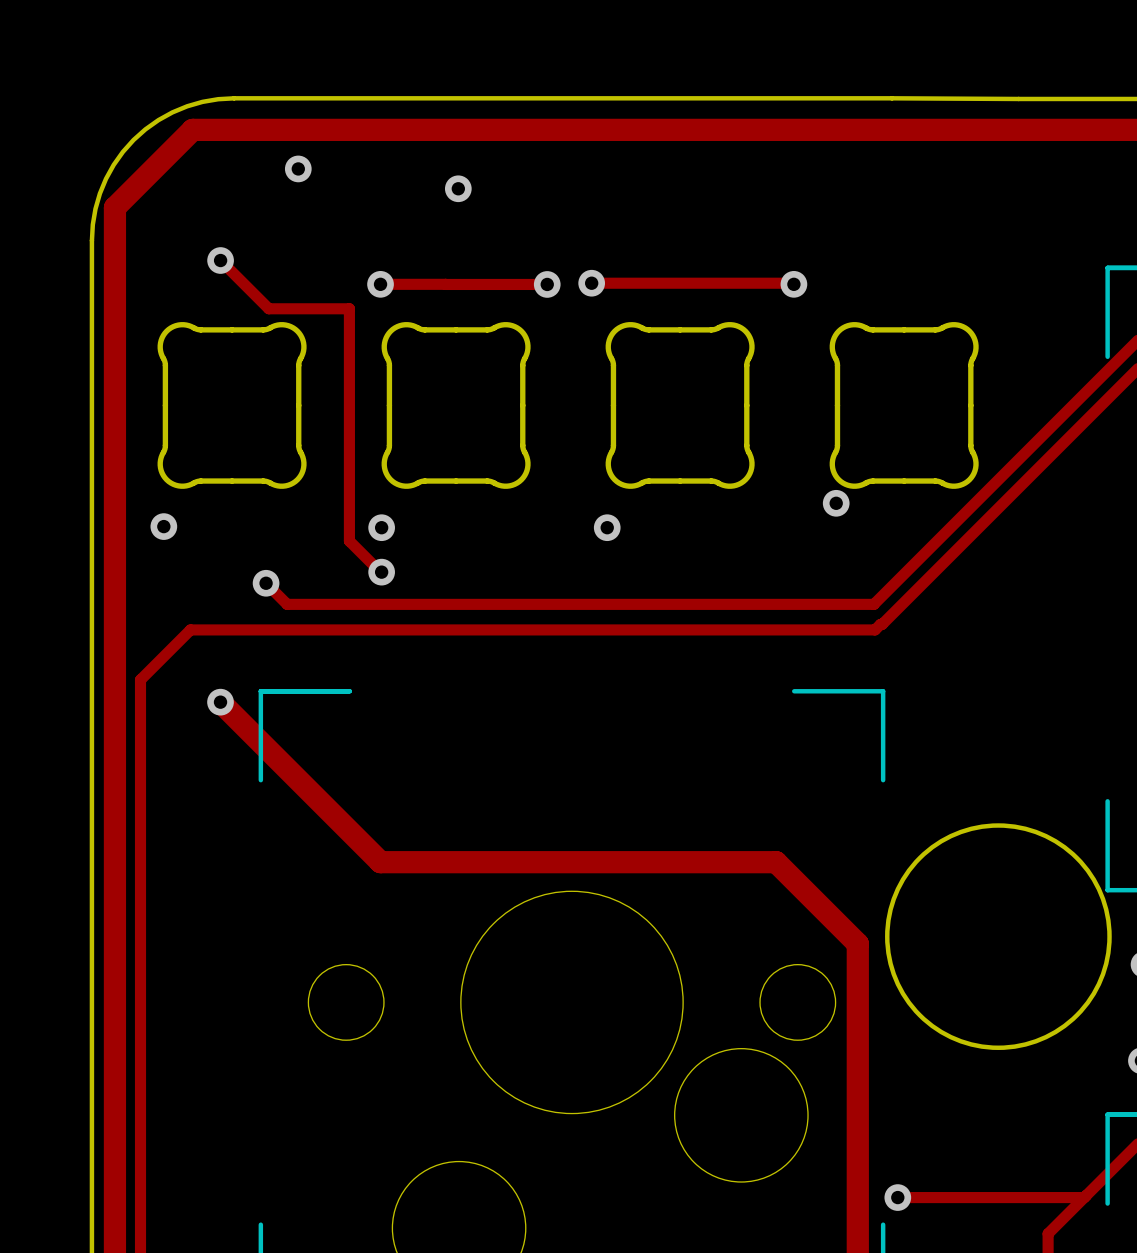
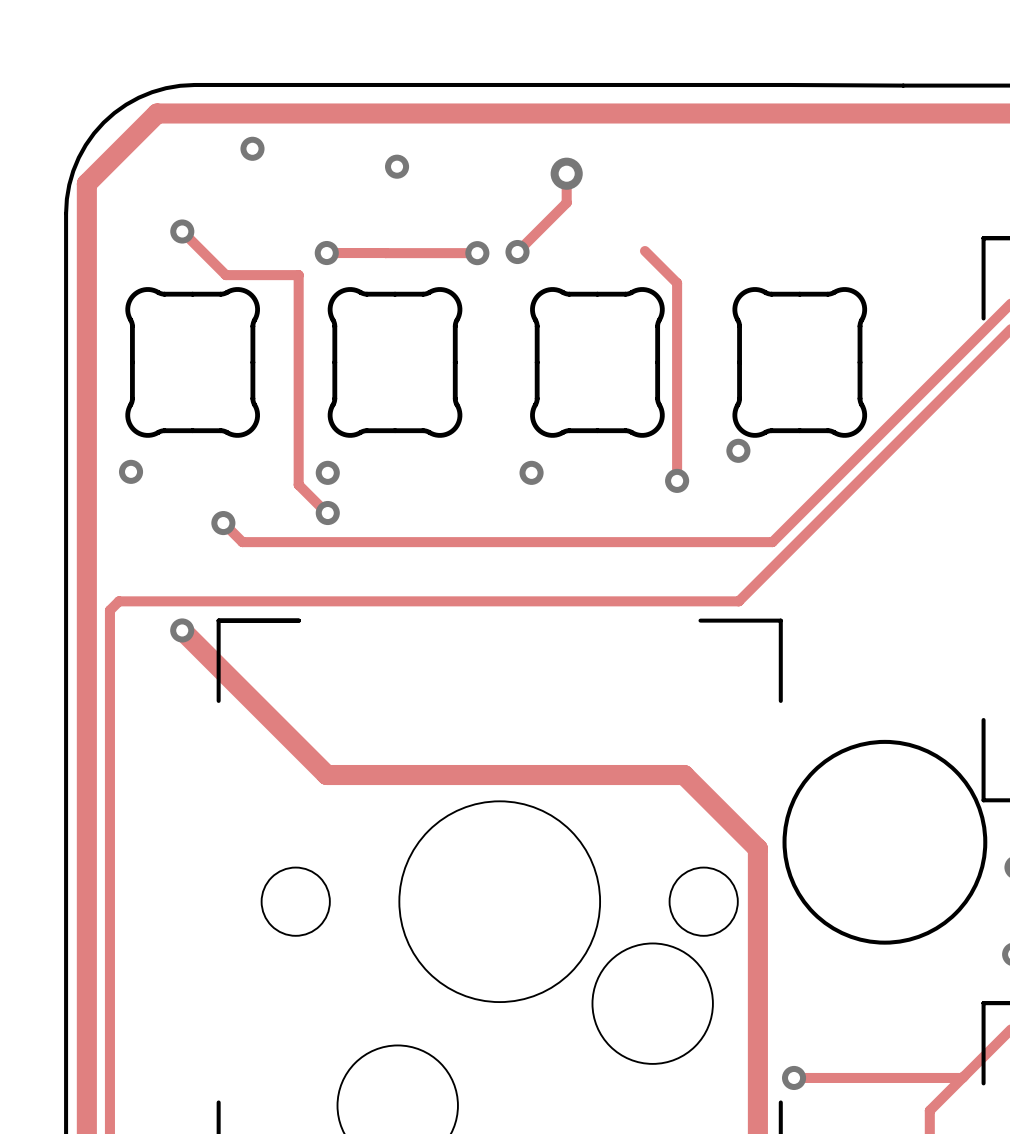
via: none -> (566, 173)
track: none -> (644, 251) (677, 283) (677, 480)
track: (591, 283) (793, 284) -> (517, 252) (566, 202) (566, 173)
via position: (793, 284) -> (677, 480)
track: (882, 624) (875, 629) (190, 629) (150, 669) -> (779, 560) (738, 601) (118, 601)

